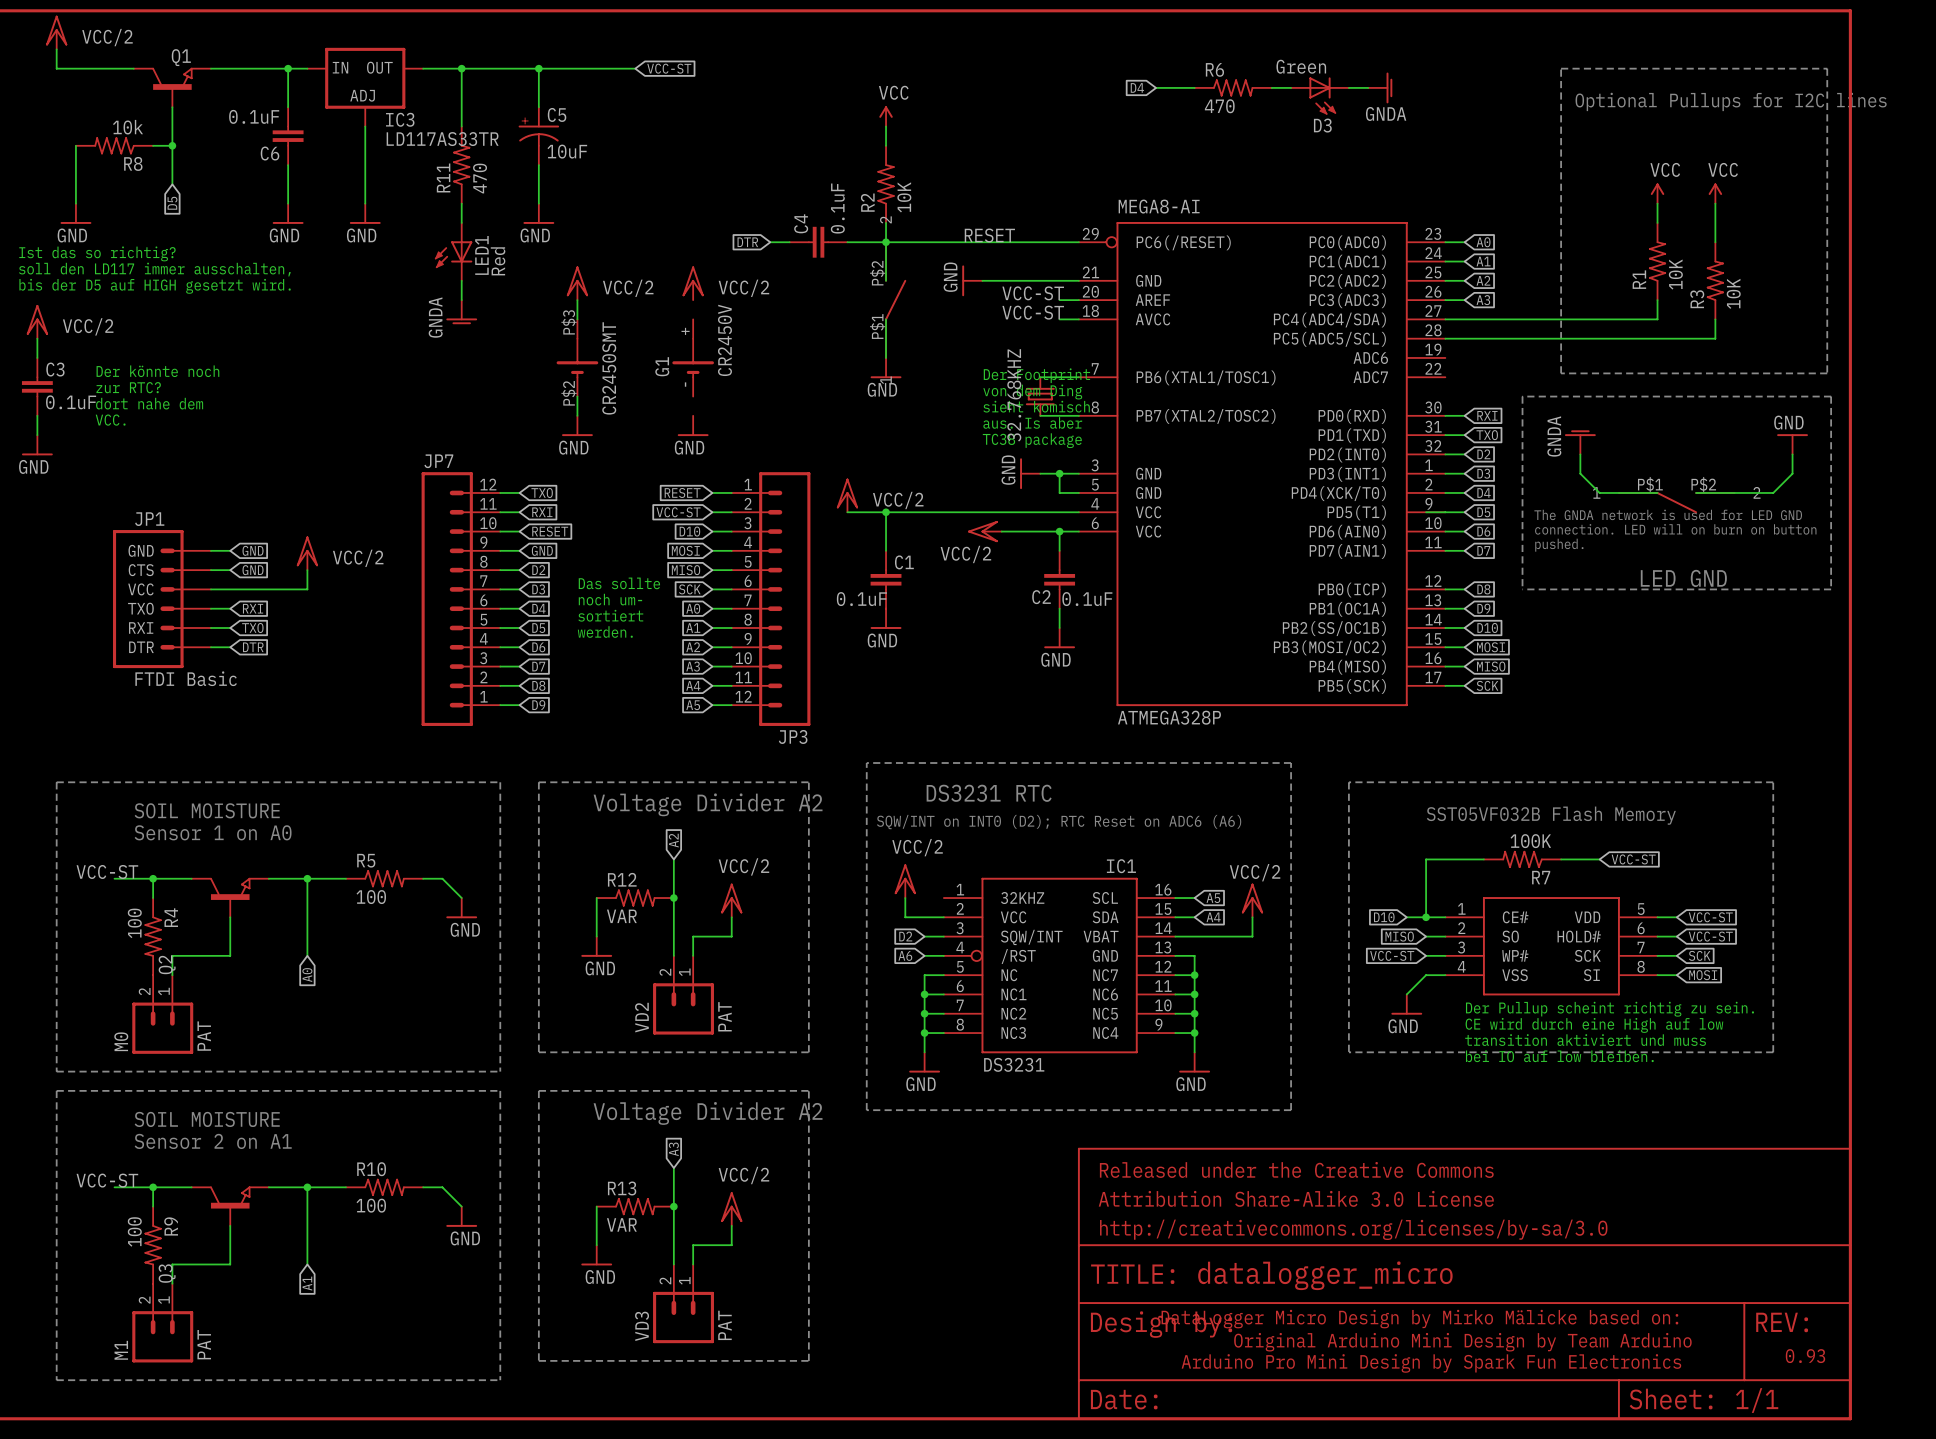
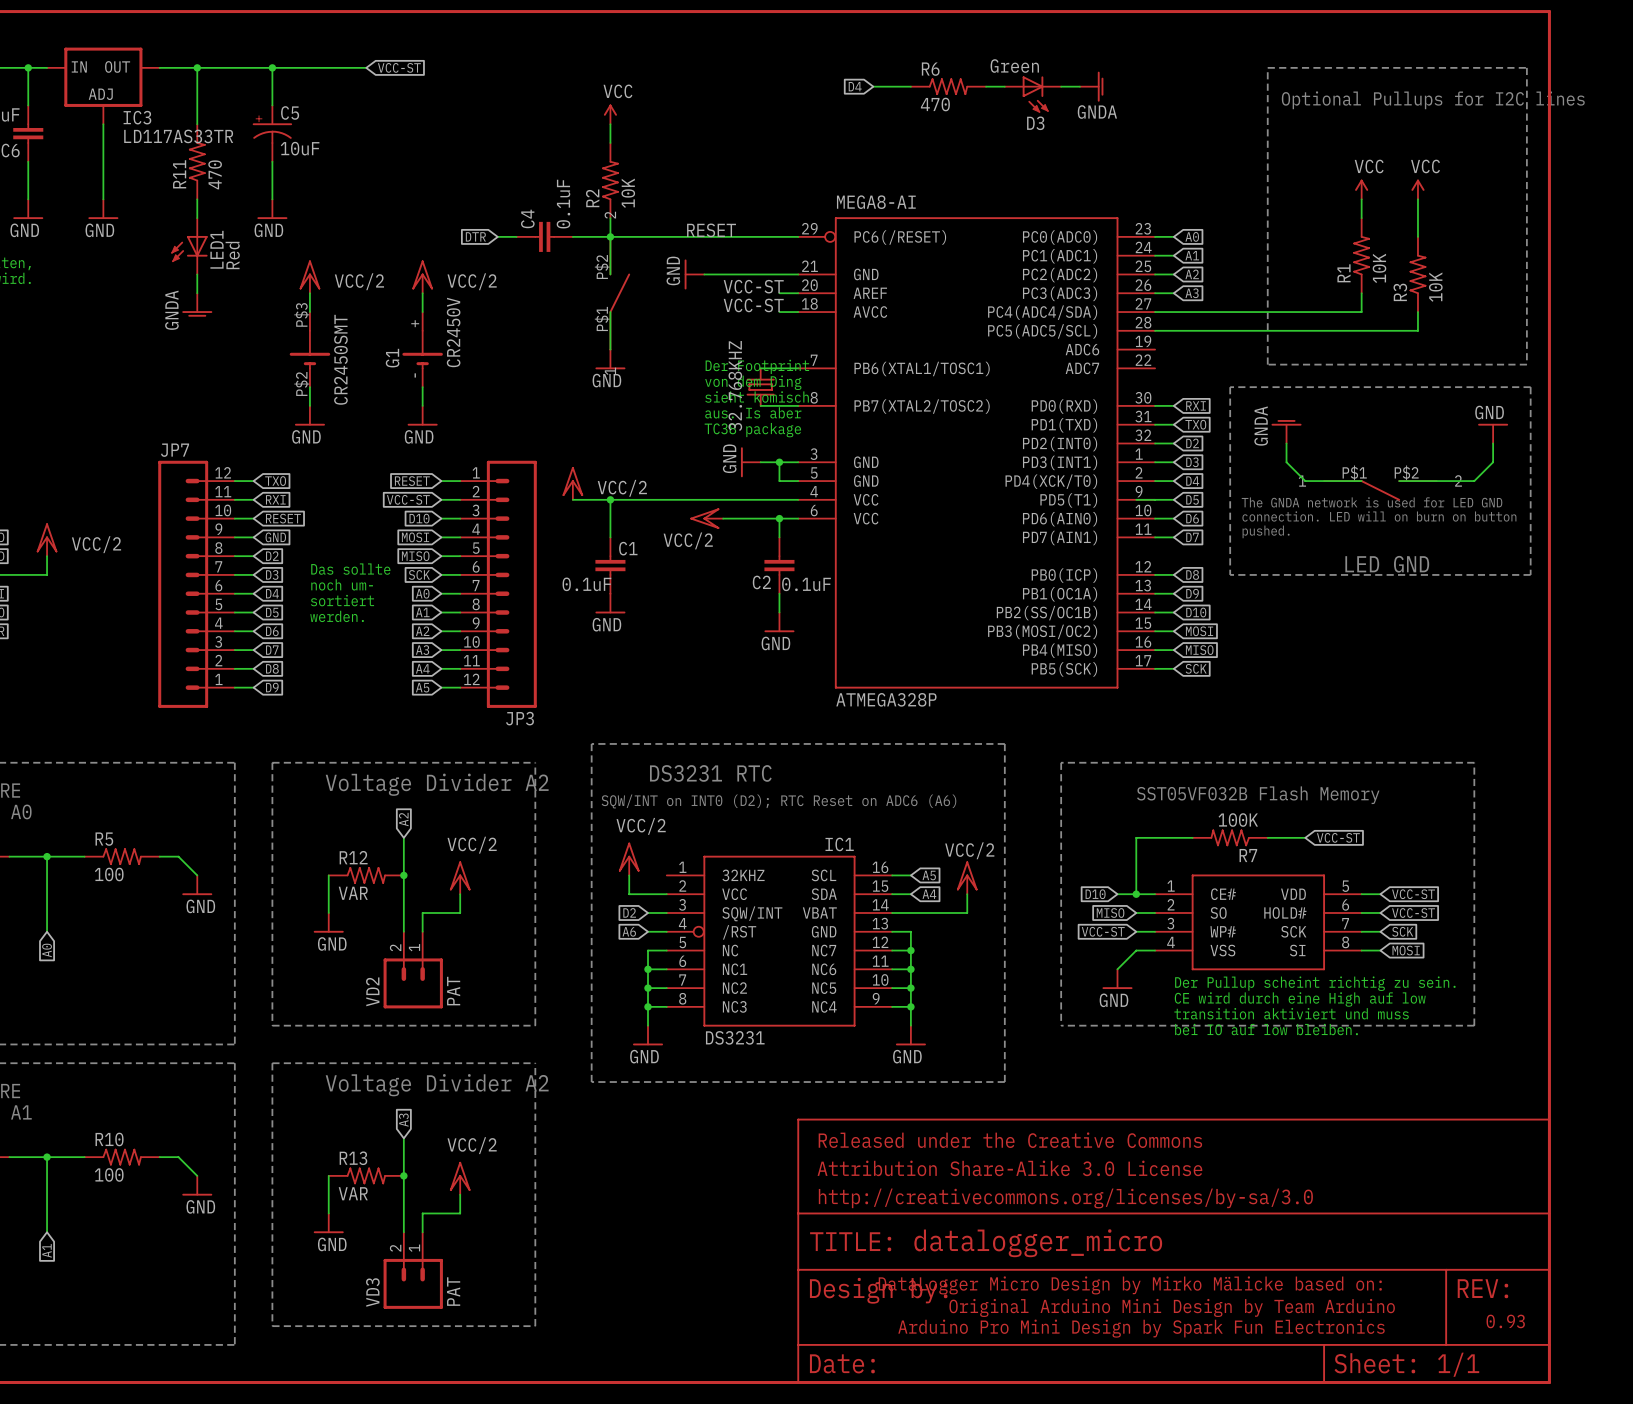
wire: none -> (422, 293) (422, 312)
wire: none -> (422, 387) (422, 405)

